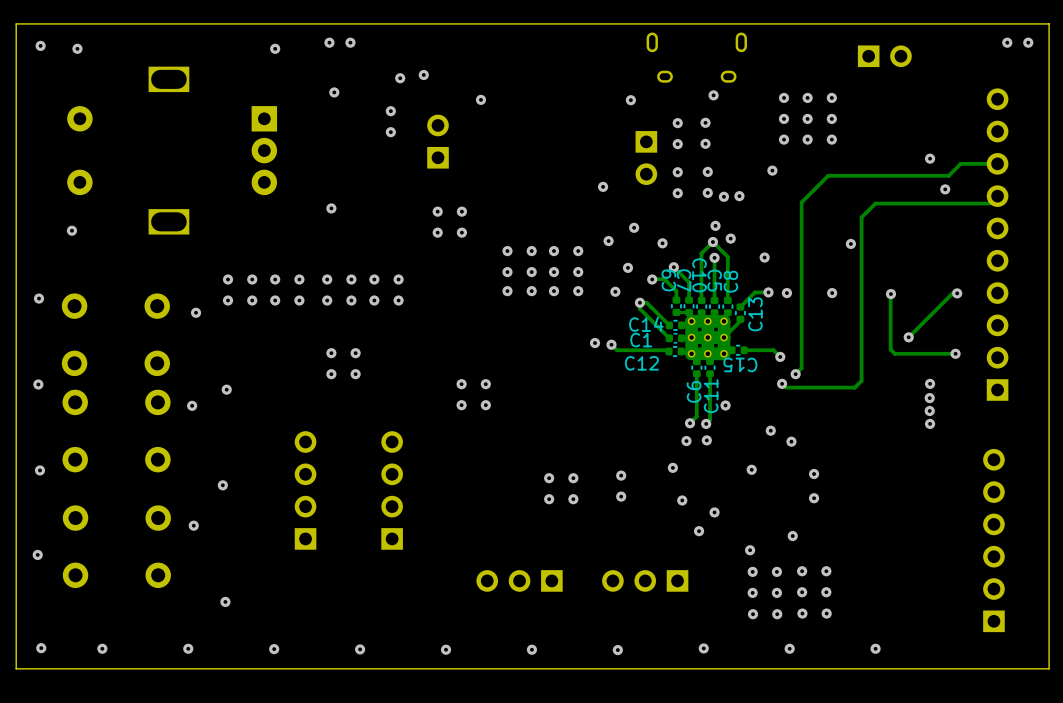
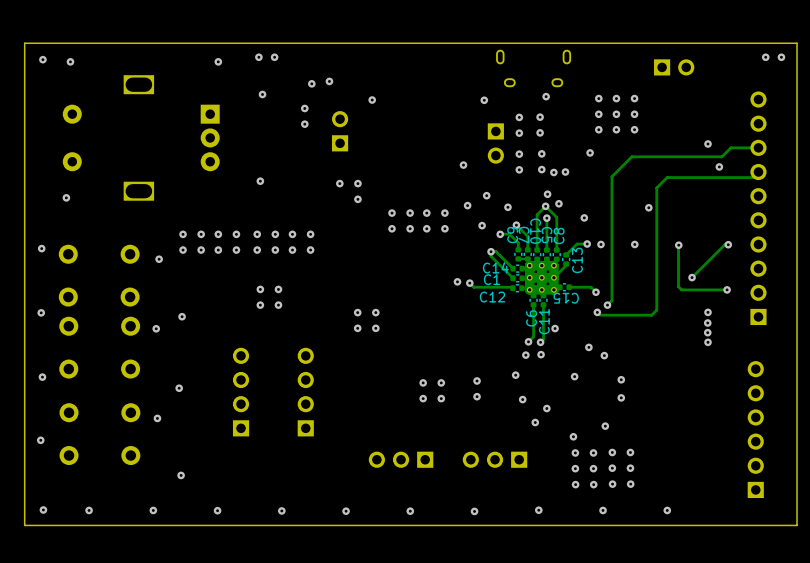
via: (437, 232) -> none
via: (507, 291) -> none
via: (531, 291) -> none
via: (553, 291) -> none
via: (578, 291) -> none
via: (615, 291) -> none

